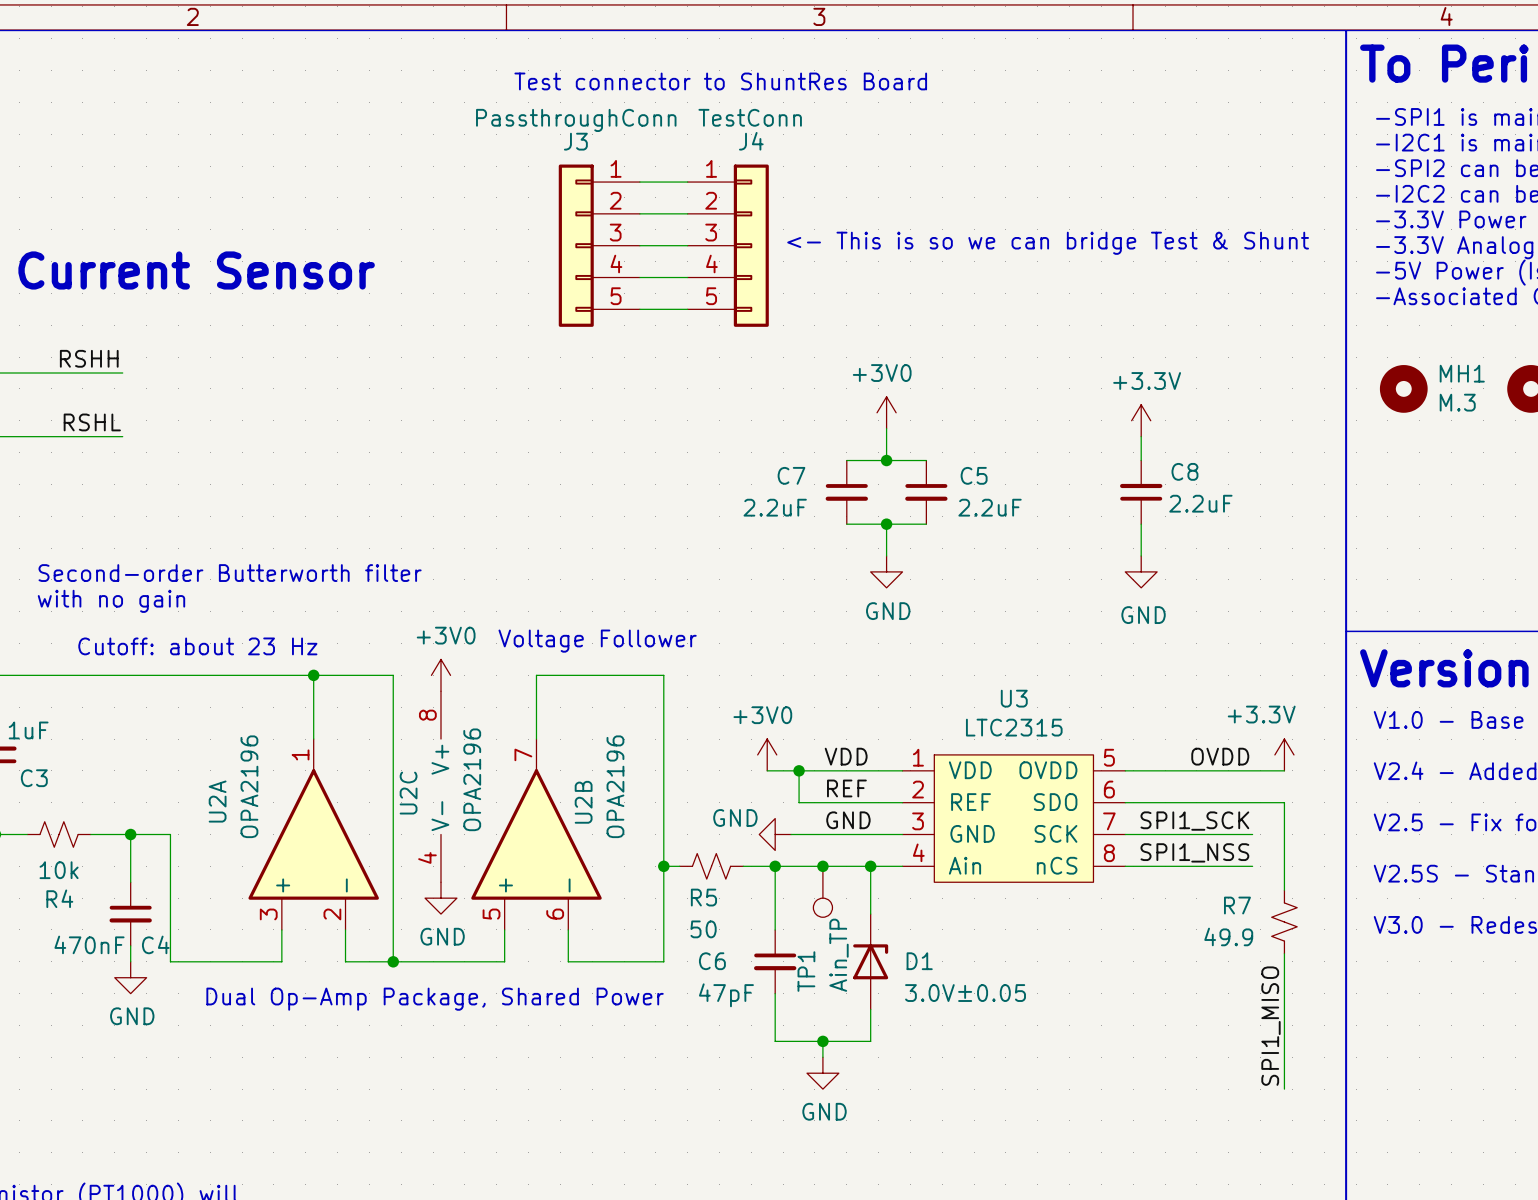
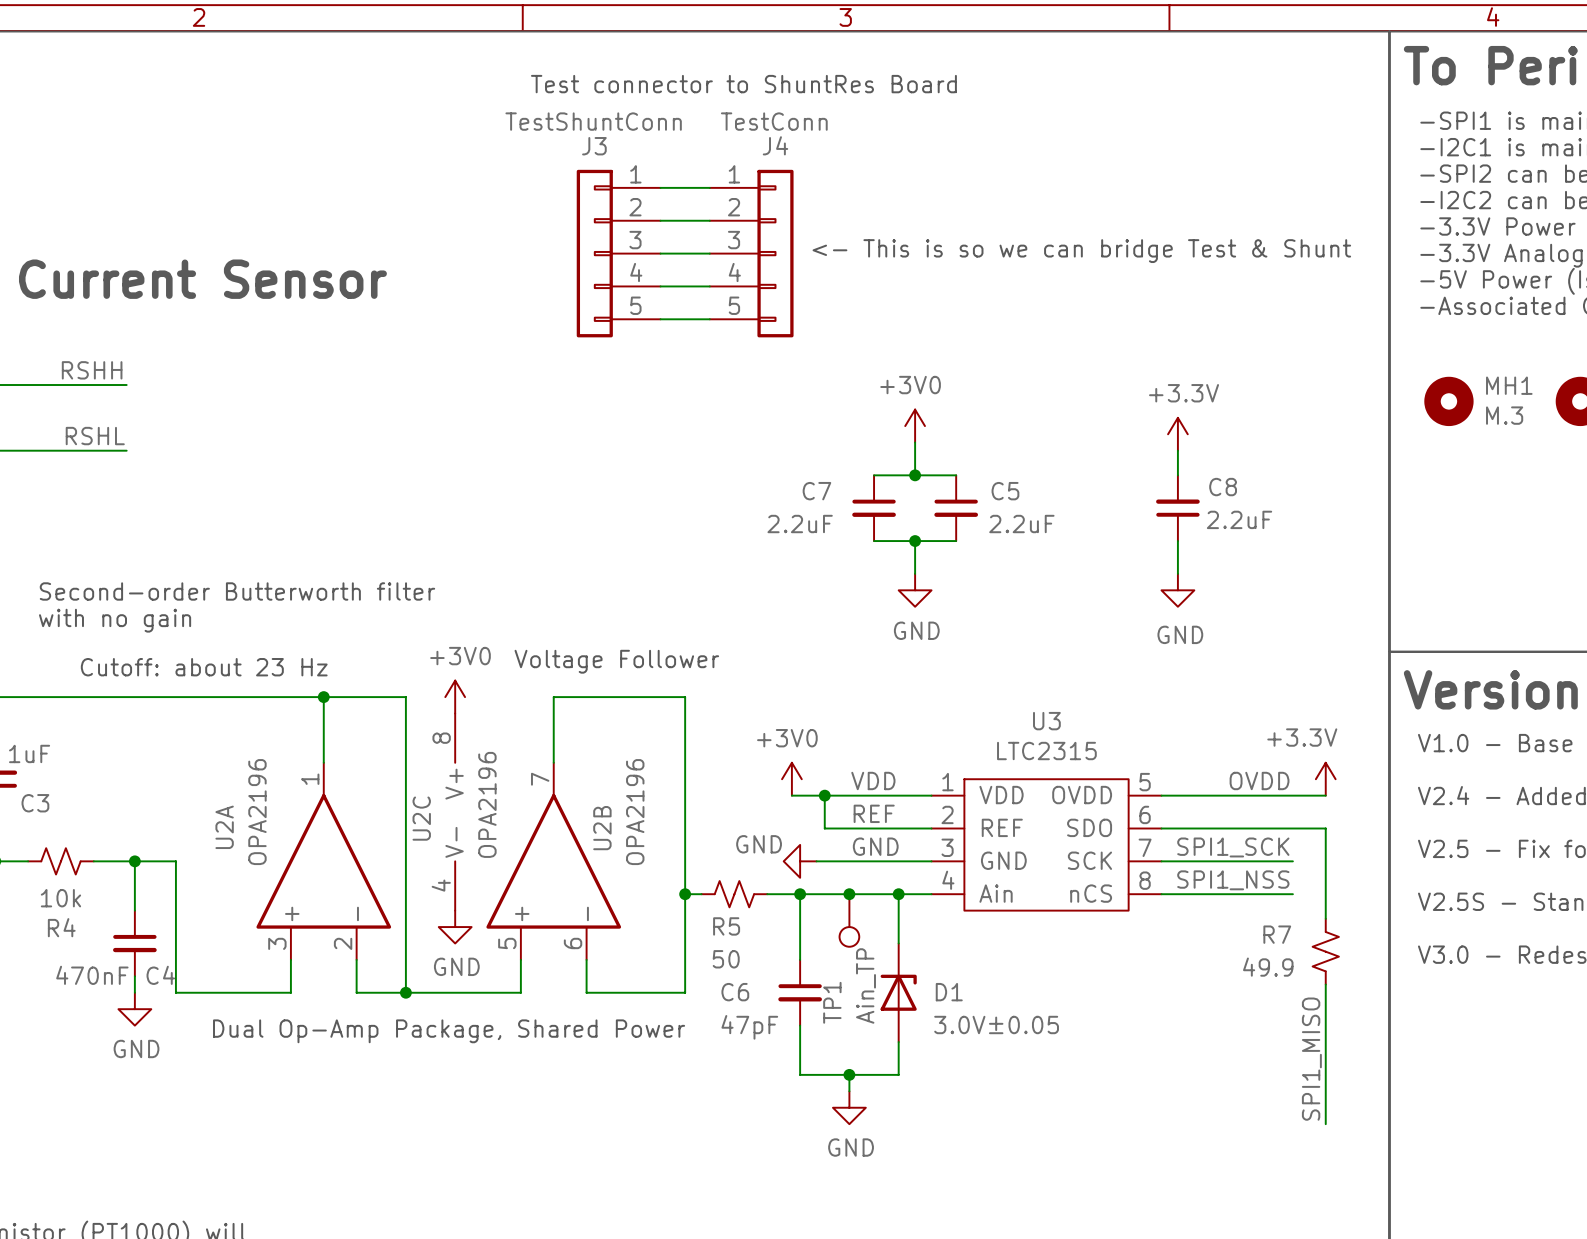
J3 value: PassthroughConn (576, 120) -> TestShuntConn (593, 121)

